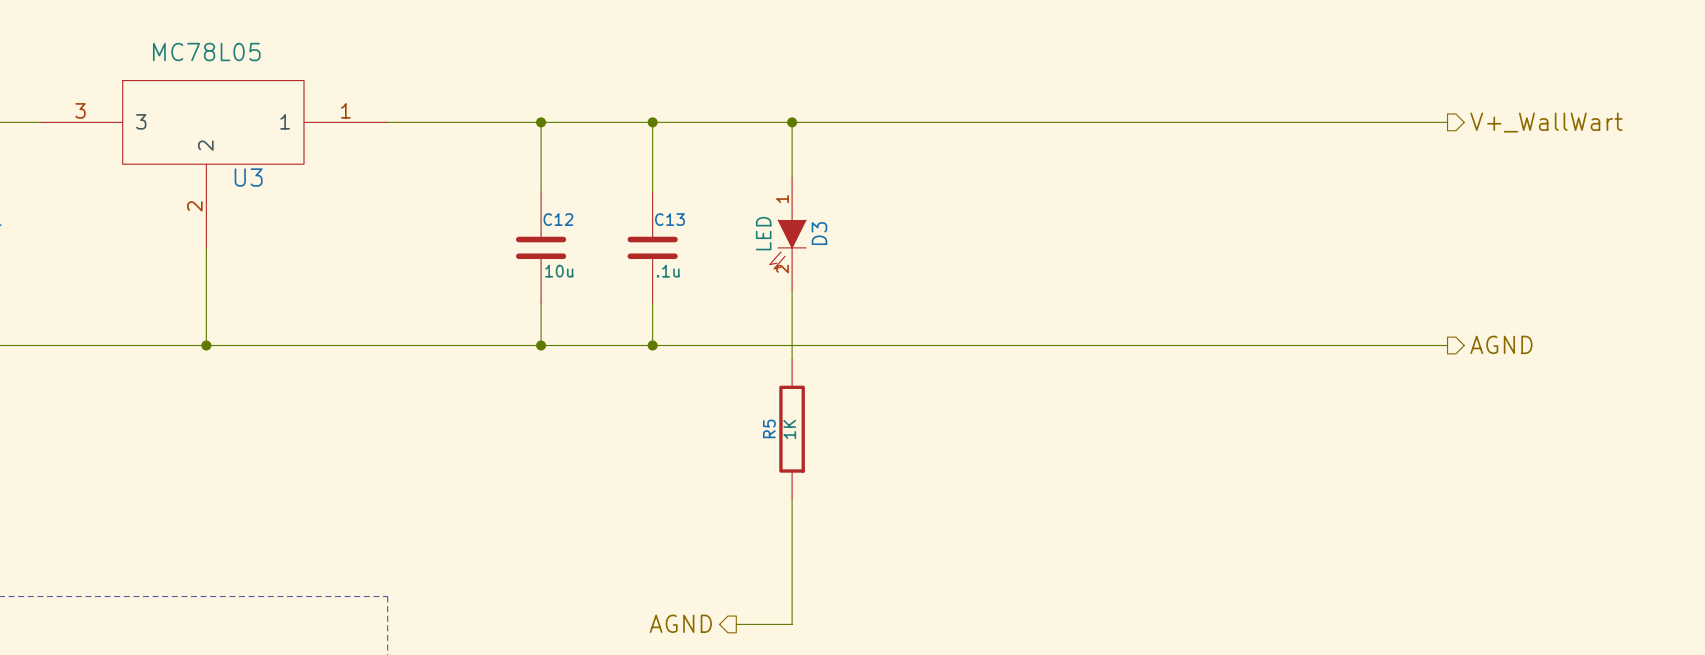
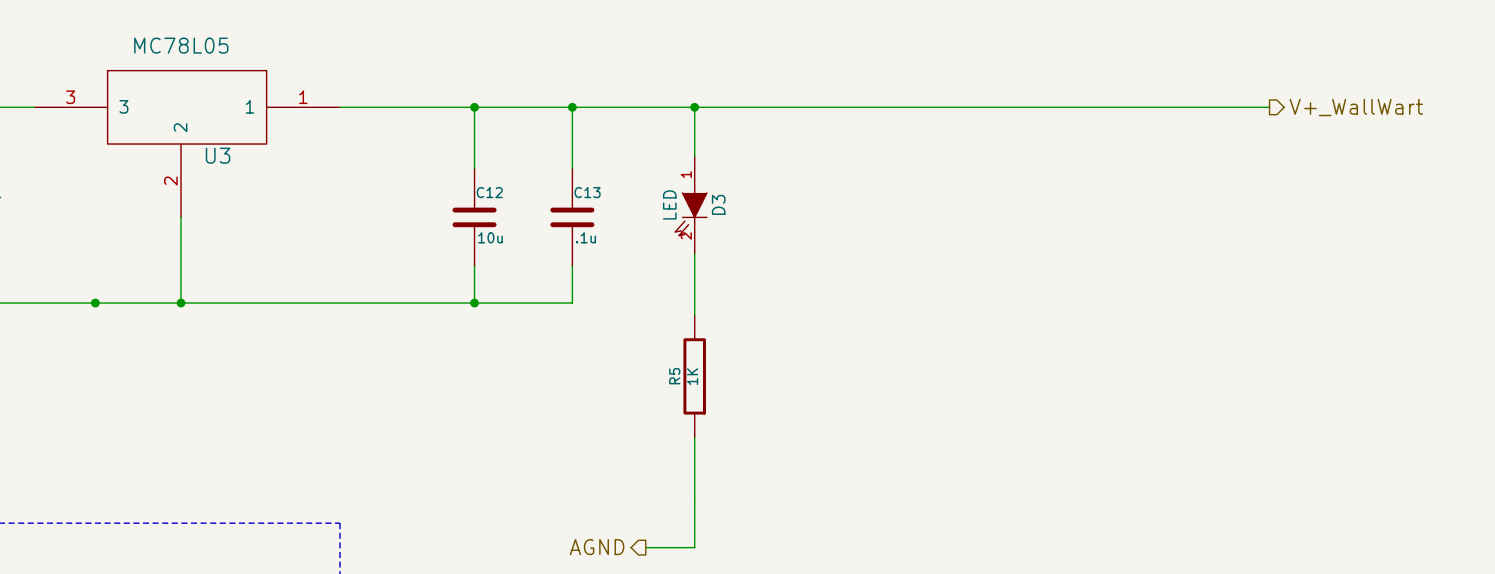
hierarchical label: AGND (1501, 344) -> none
junction: none -> (95, 303)
wire: (652, 345) (1447, 345) -> none
junction: (652, 345) -> none

